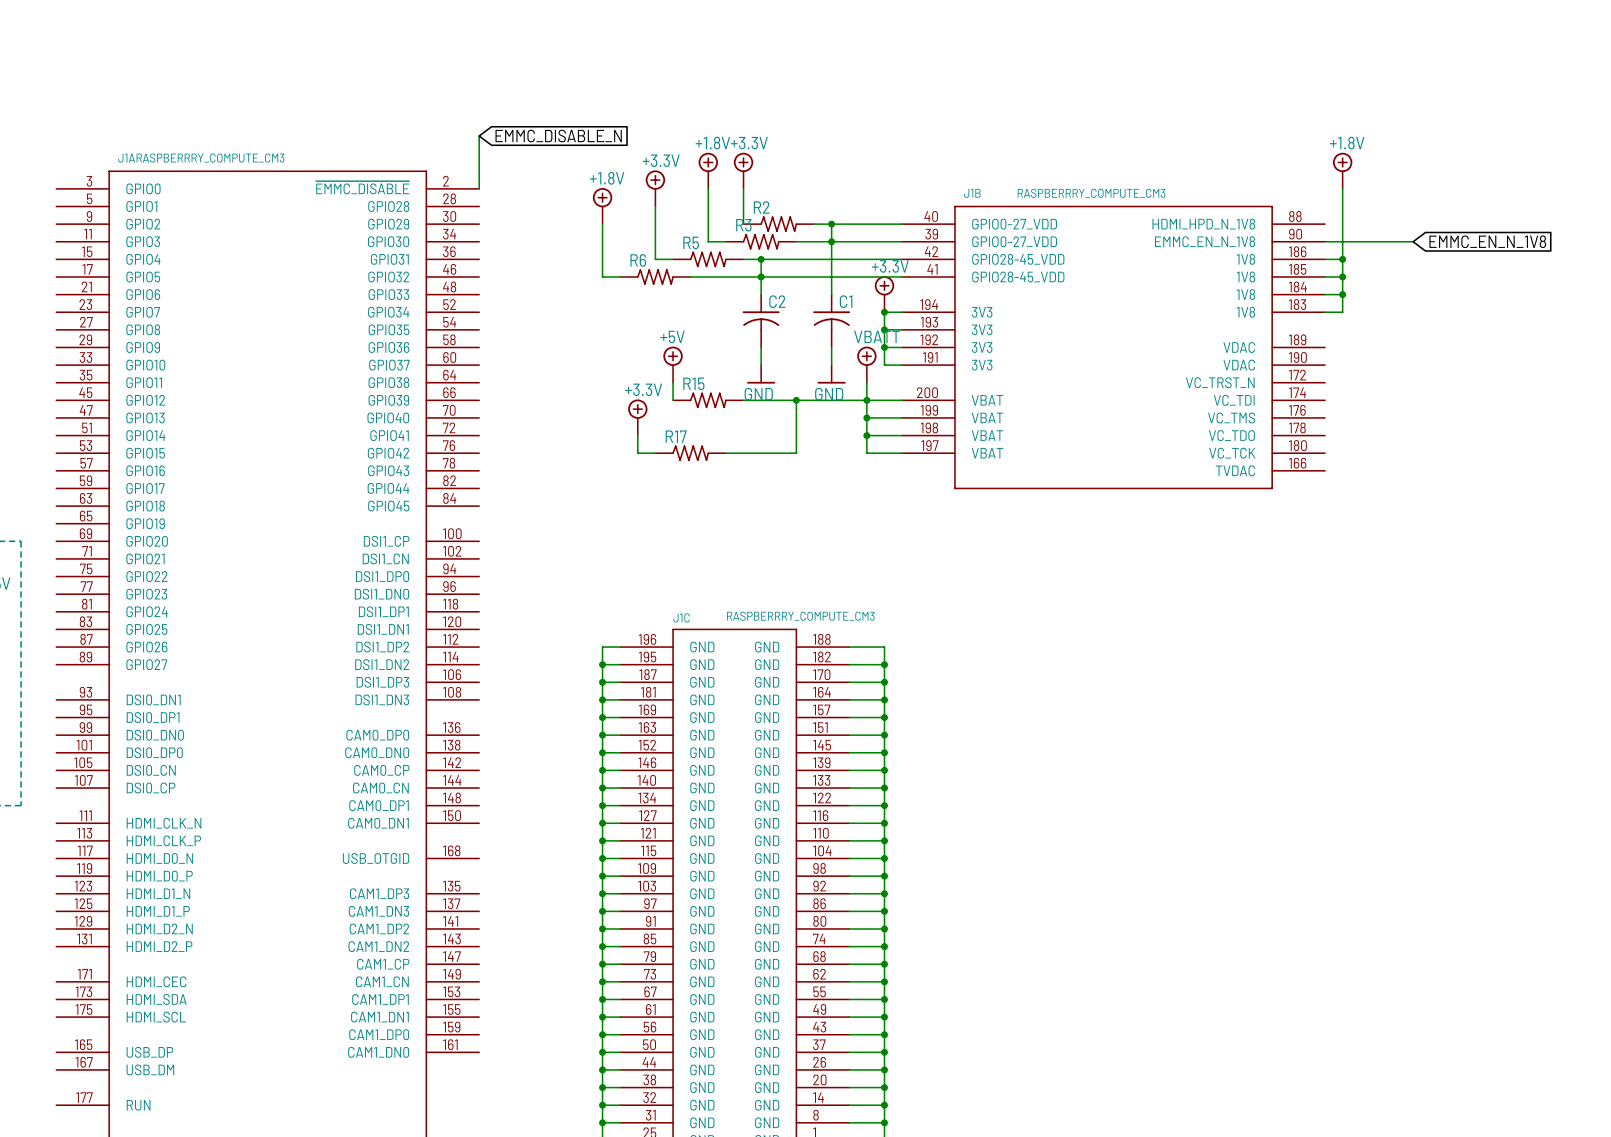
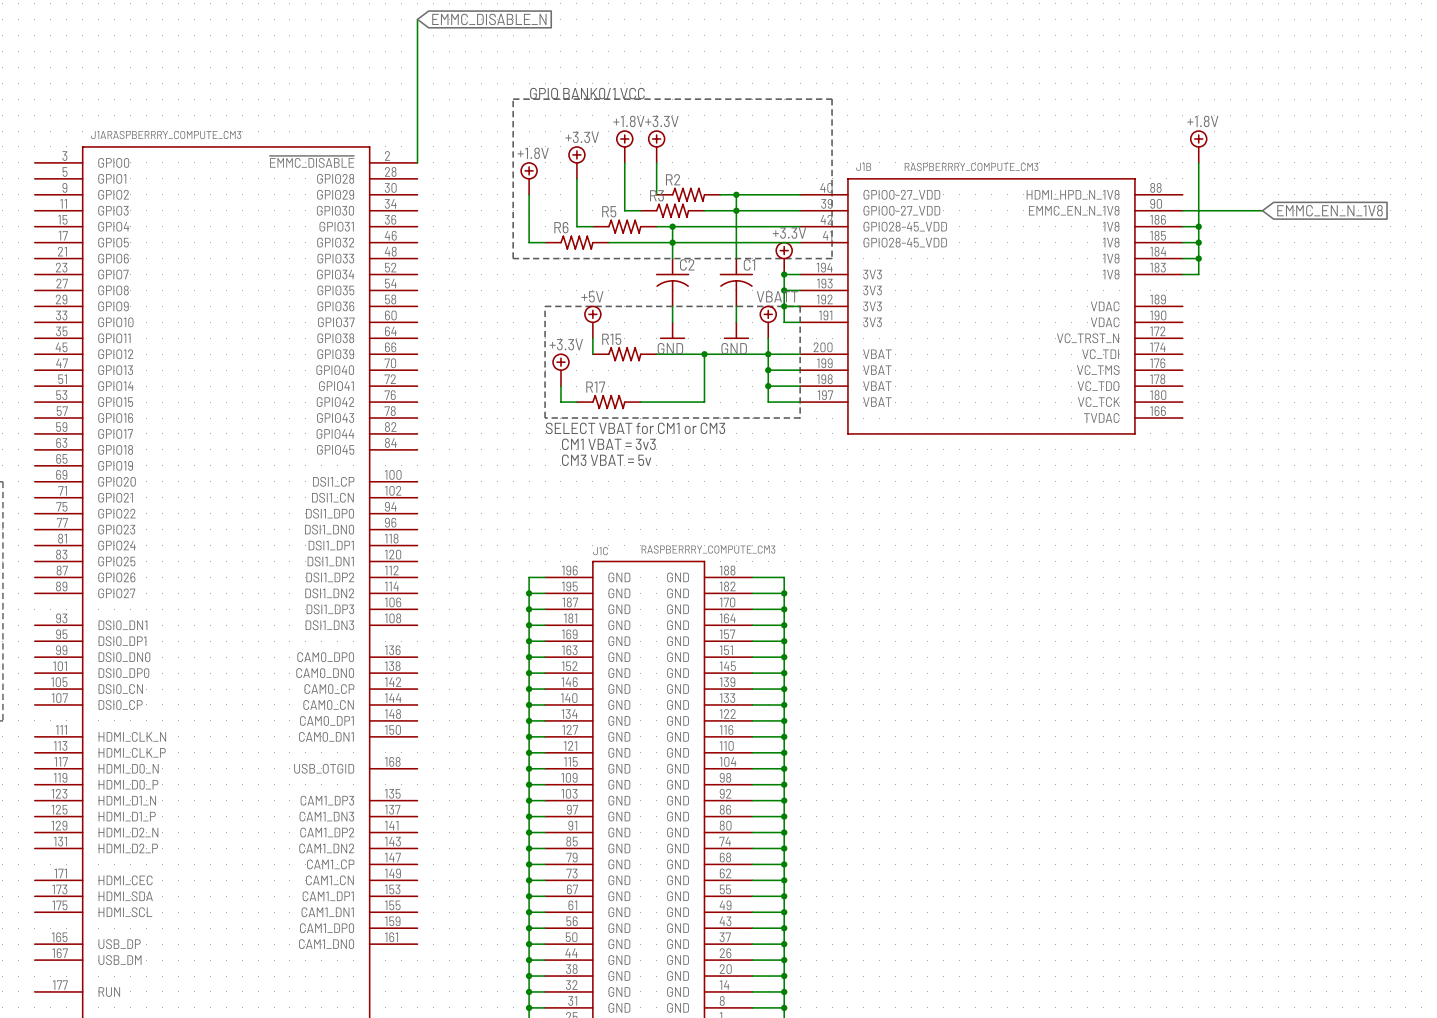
wire: none -> (417, 19) (417, 115)
text: none -> GPIO BANK0/1 VCC (587, 93)
line: none -> (513, 99) (513, 258) (832, 258) (832, 99) (513, 99)
global label position: EMMC_DISABLE_N (558, 136) -> EMMC_DISABLE_N (489, 19)
line: none -> (545, 306) (545, 418) (800, 418) (800, 306) (545, 306)
text: none -> SELECT VBAT for CM1 or CM3 (635, 428)
text: none -> CM1 VBAT = 3v3 (608, 444)
text: none -> CM3 VBAT = 5v (606, 460)

